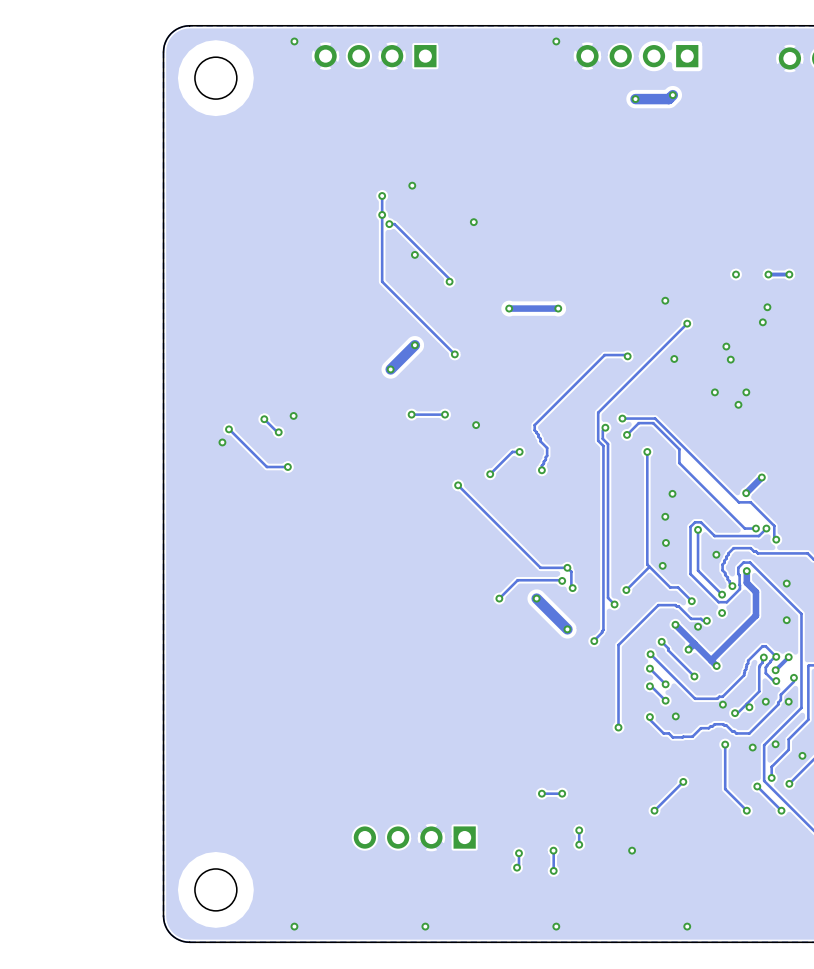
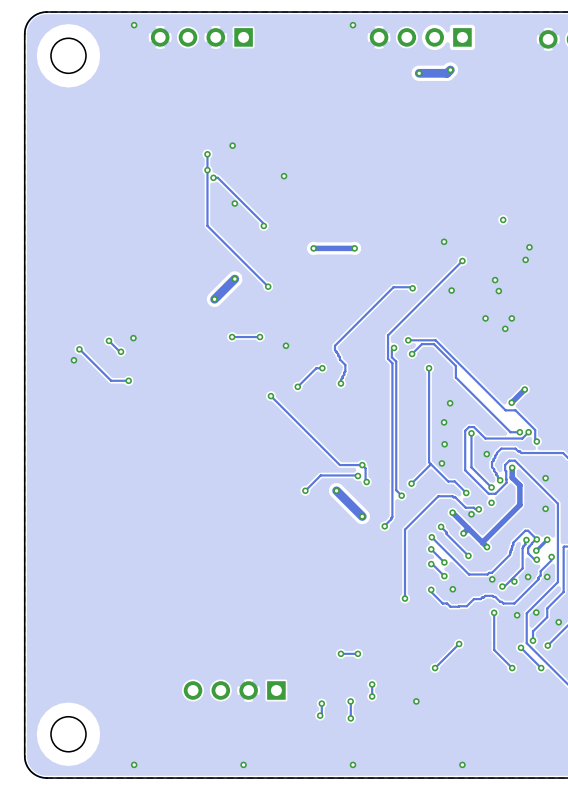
via: (768, 274) -> none
track: (789, 274) (768, 274) -> none
via: (789, 274) -> none

